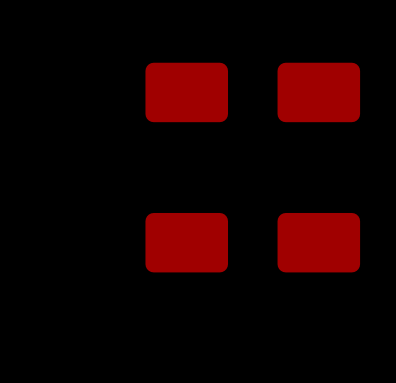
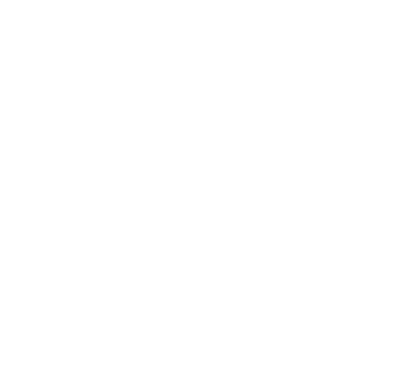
part: (252, 92) -> none
part: (252, 242) -> none

